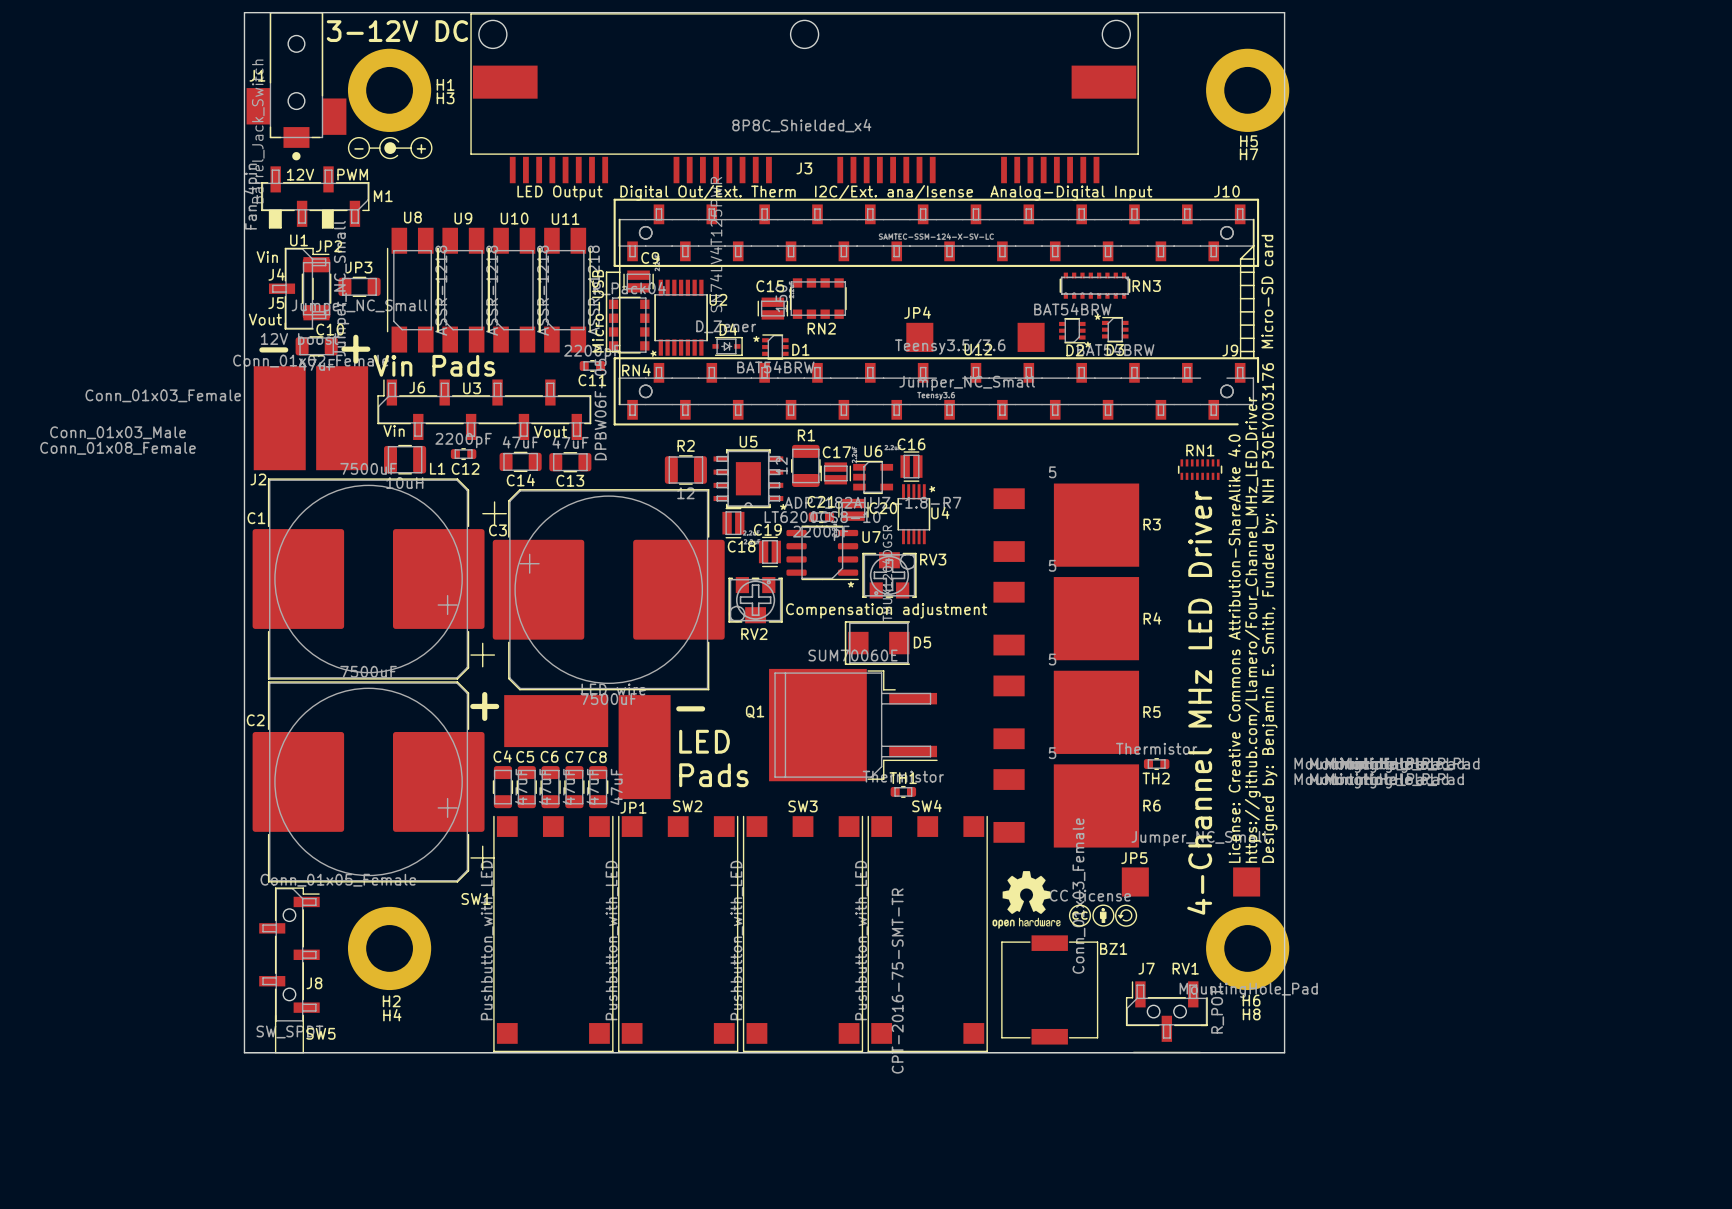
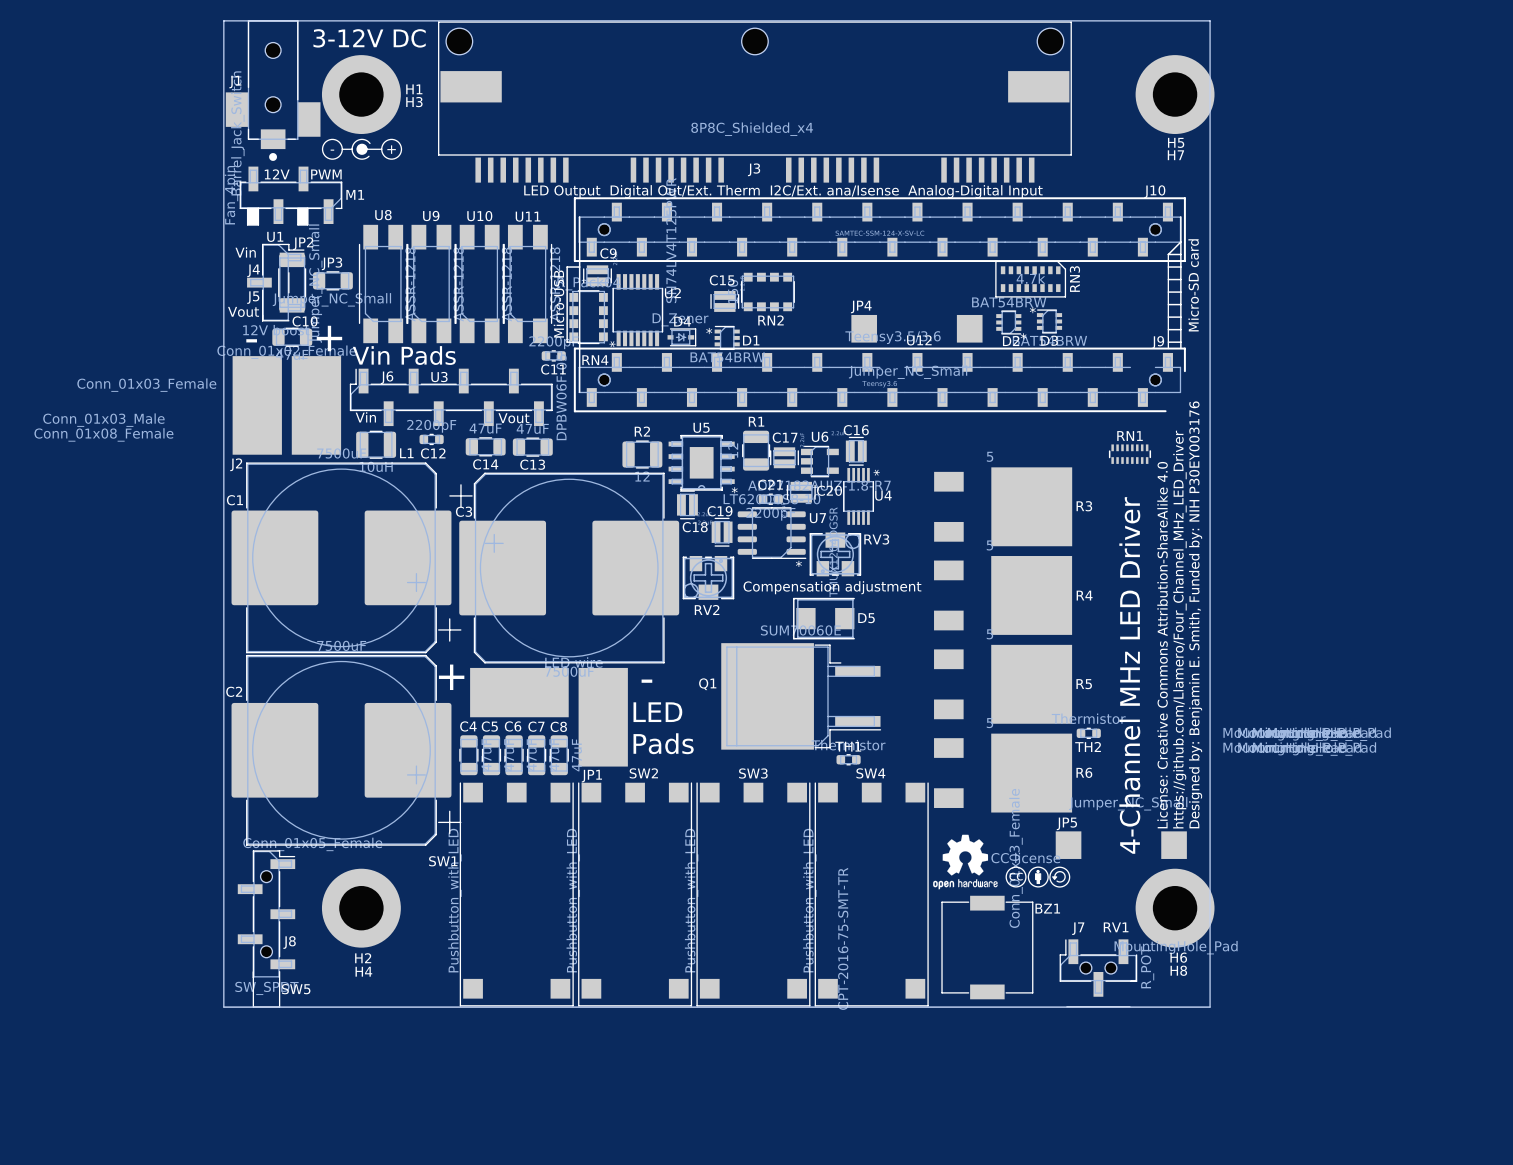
RN3 footprint: [1059, 272, 1131, 299] -> [995, 260, 1067, 298]
RN3 value: none -> 4.7k (1030, 278)

